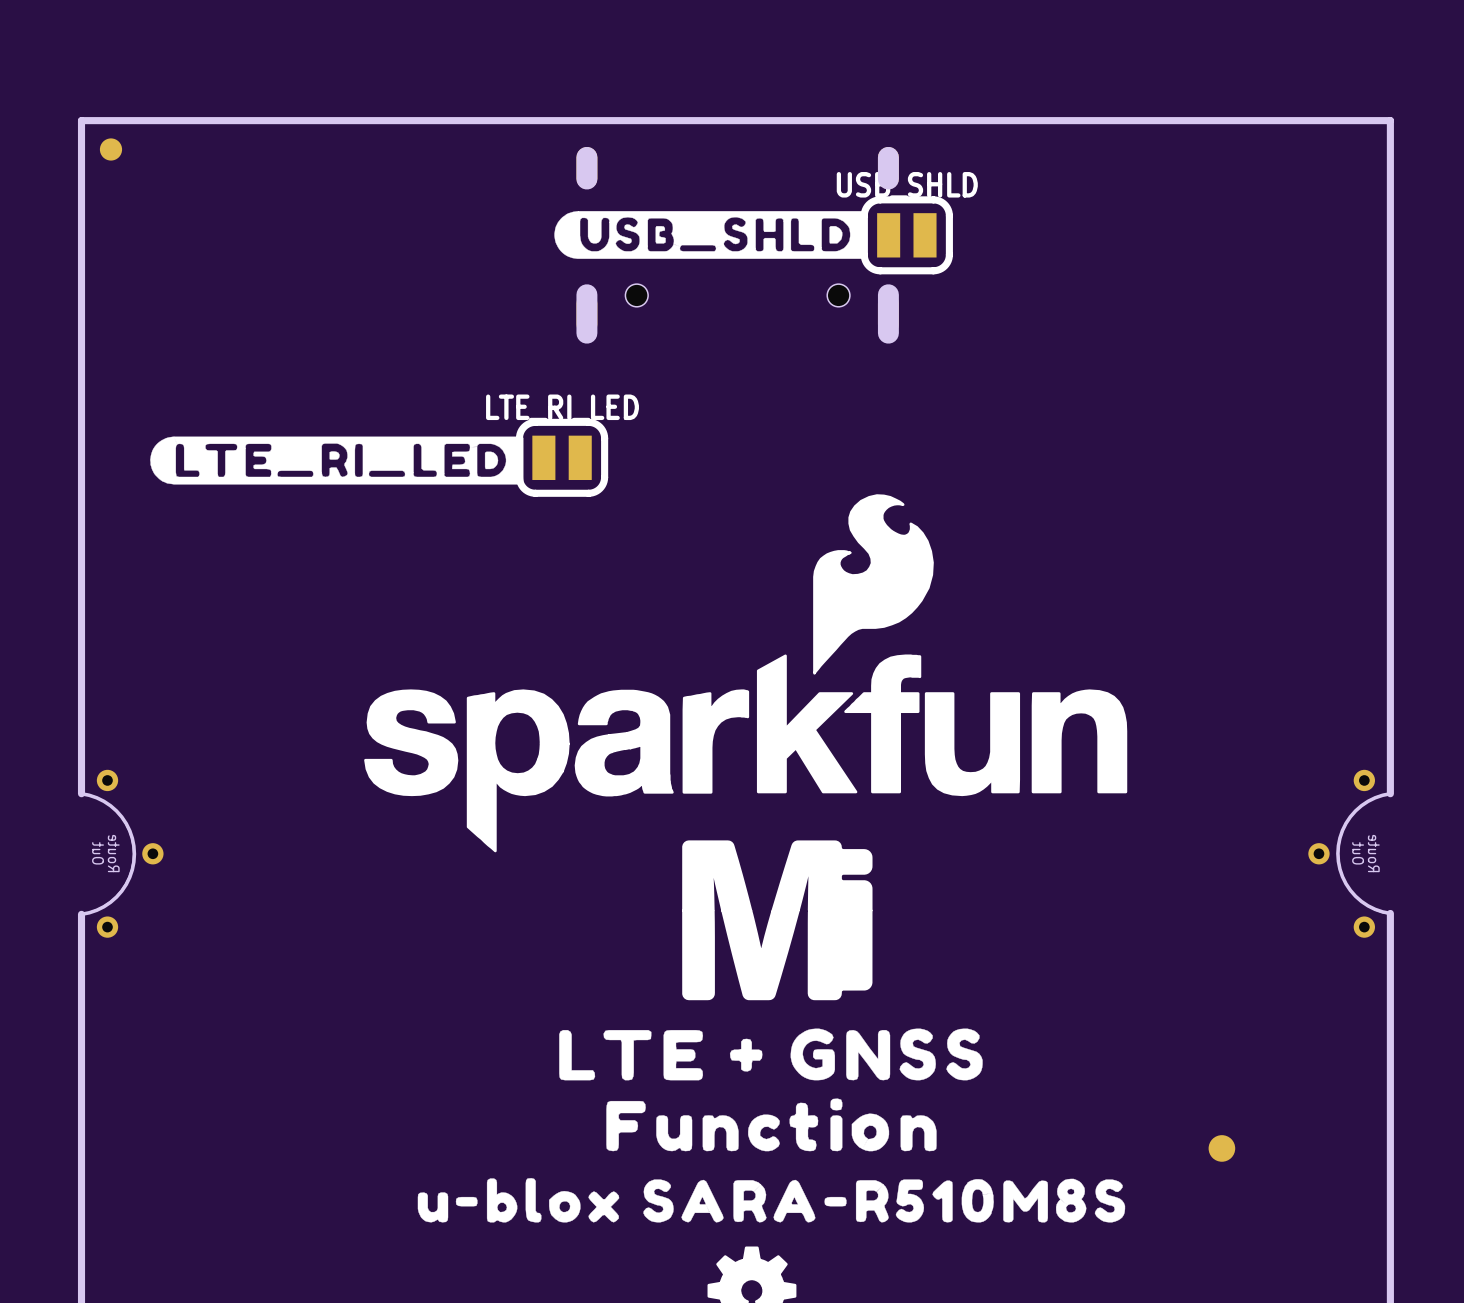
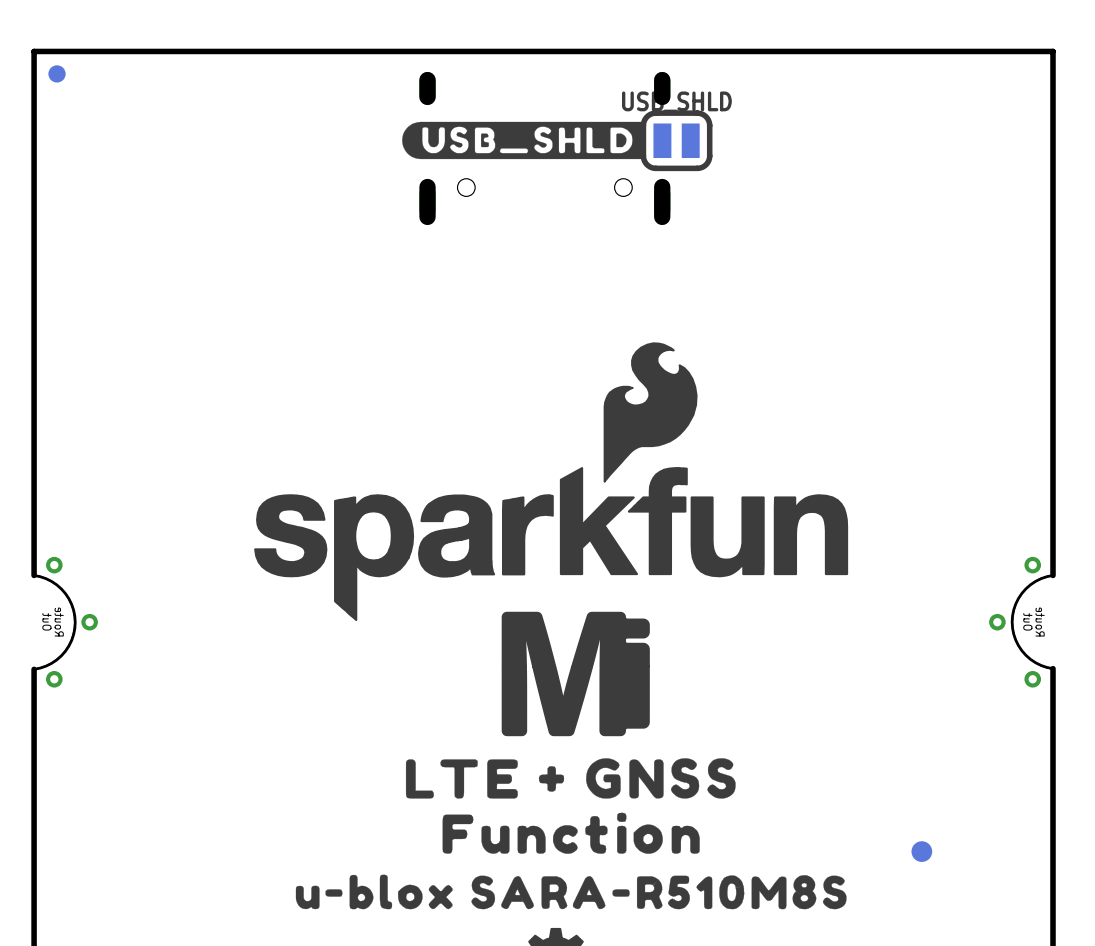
drawing: [150, 436, 524, 485] -> none
LTE_RI_LED: (562, 457) -> none

